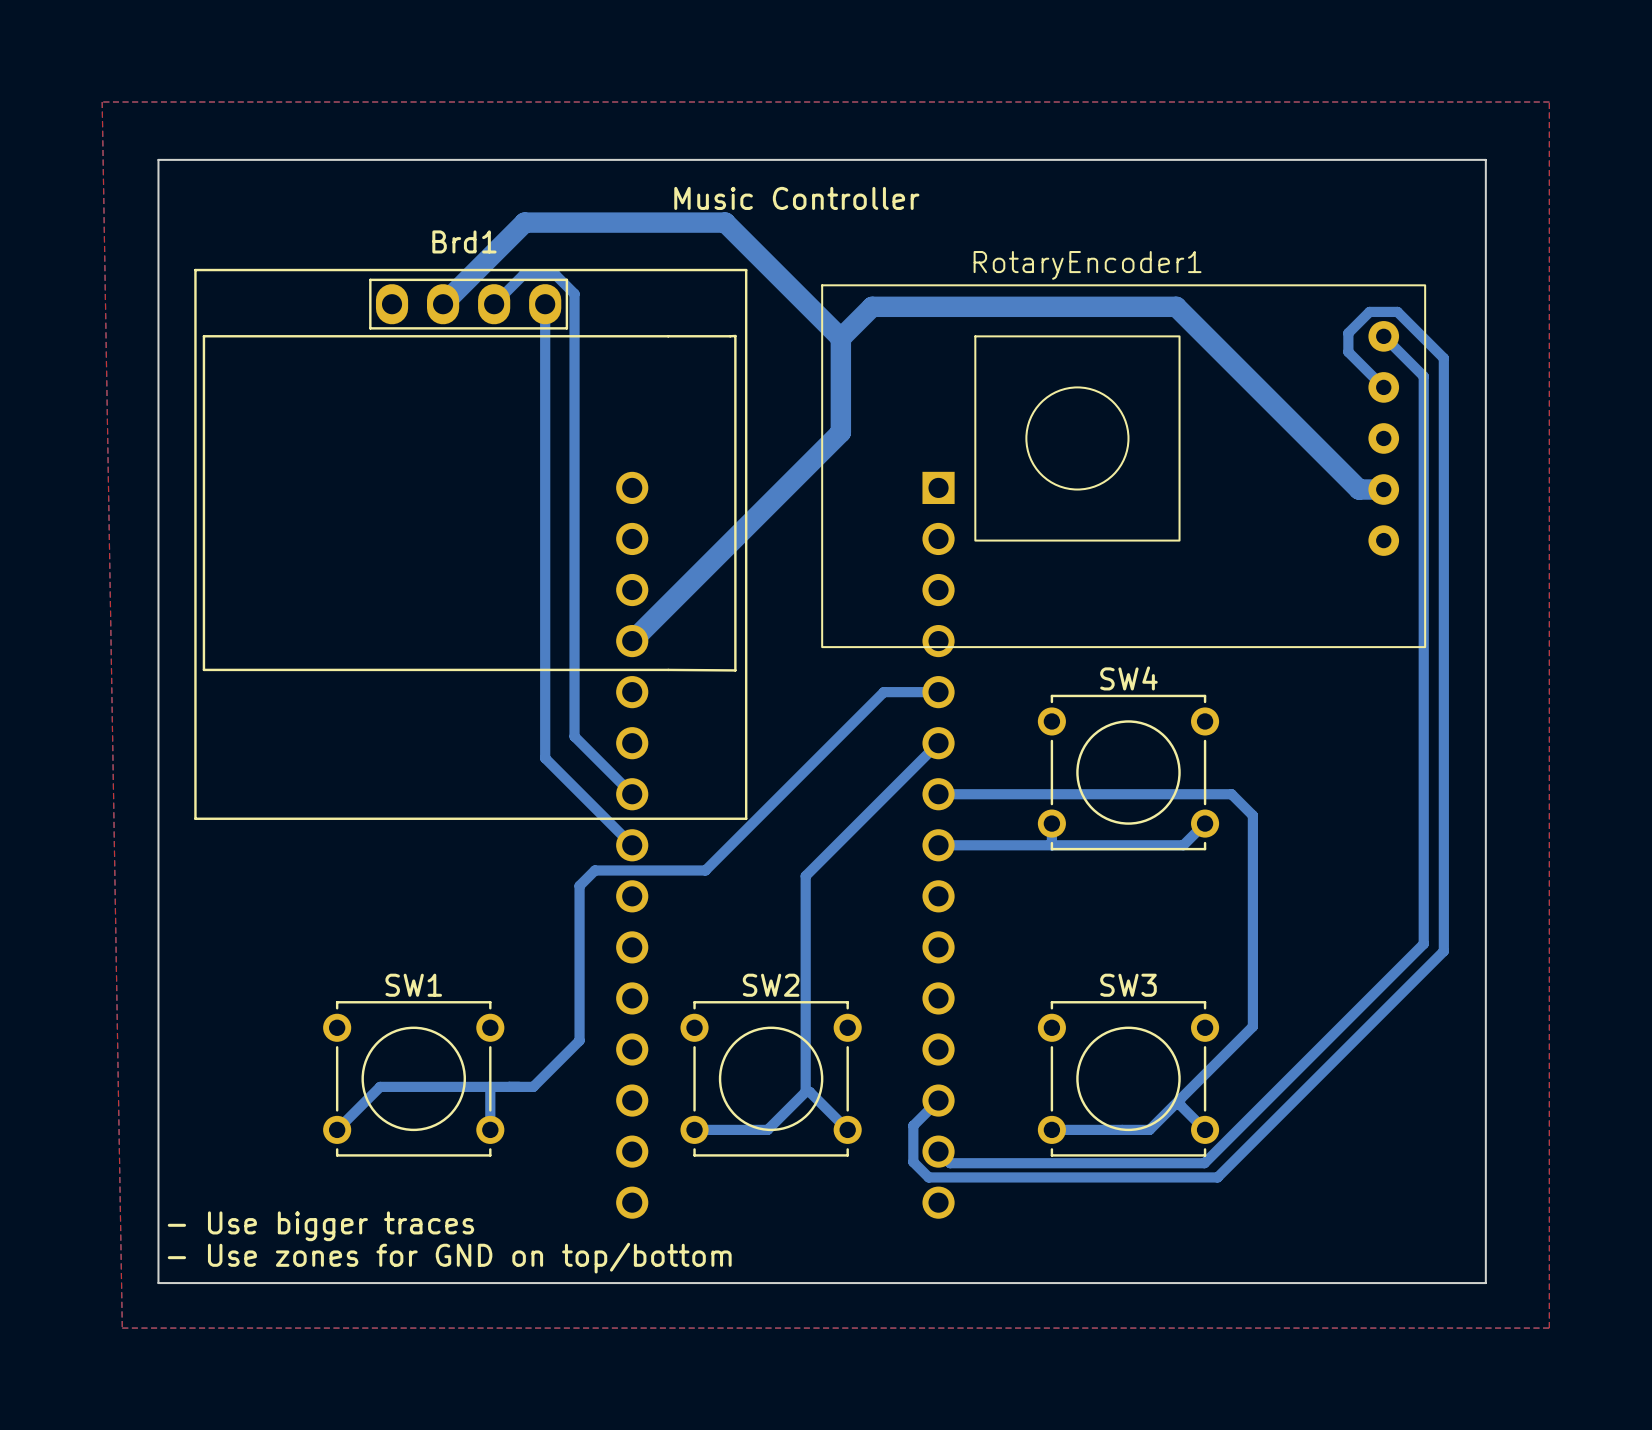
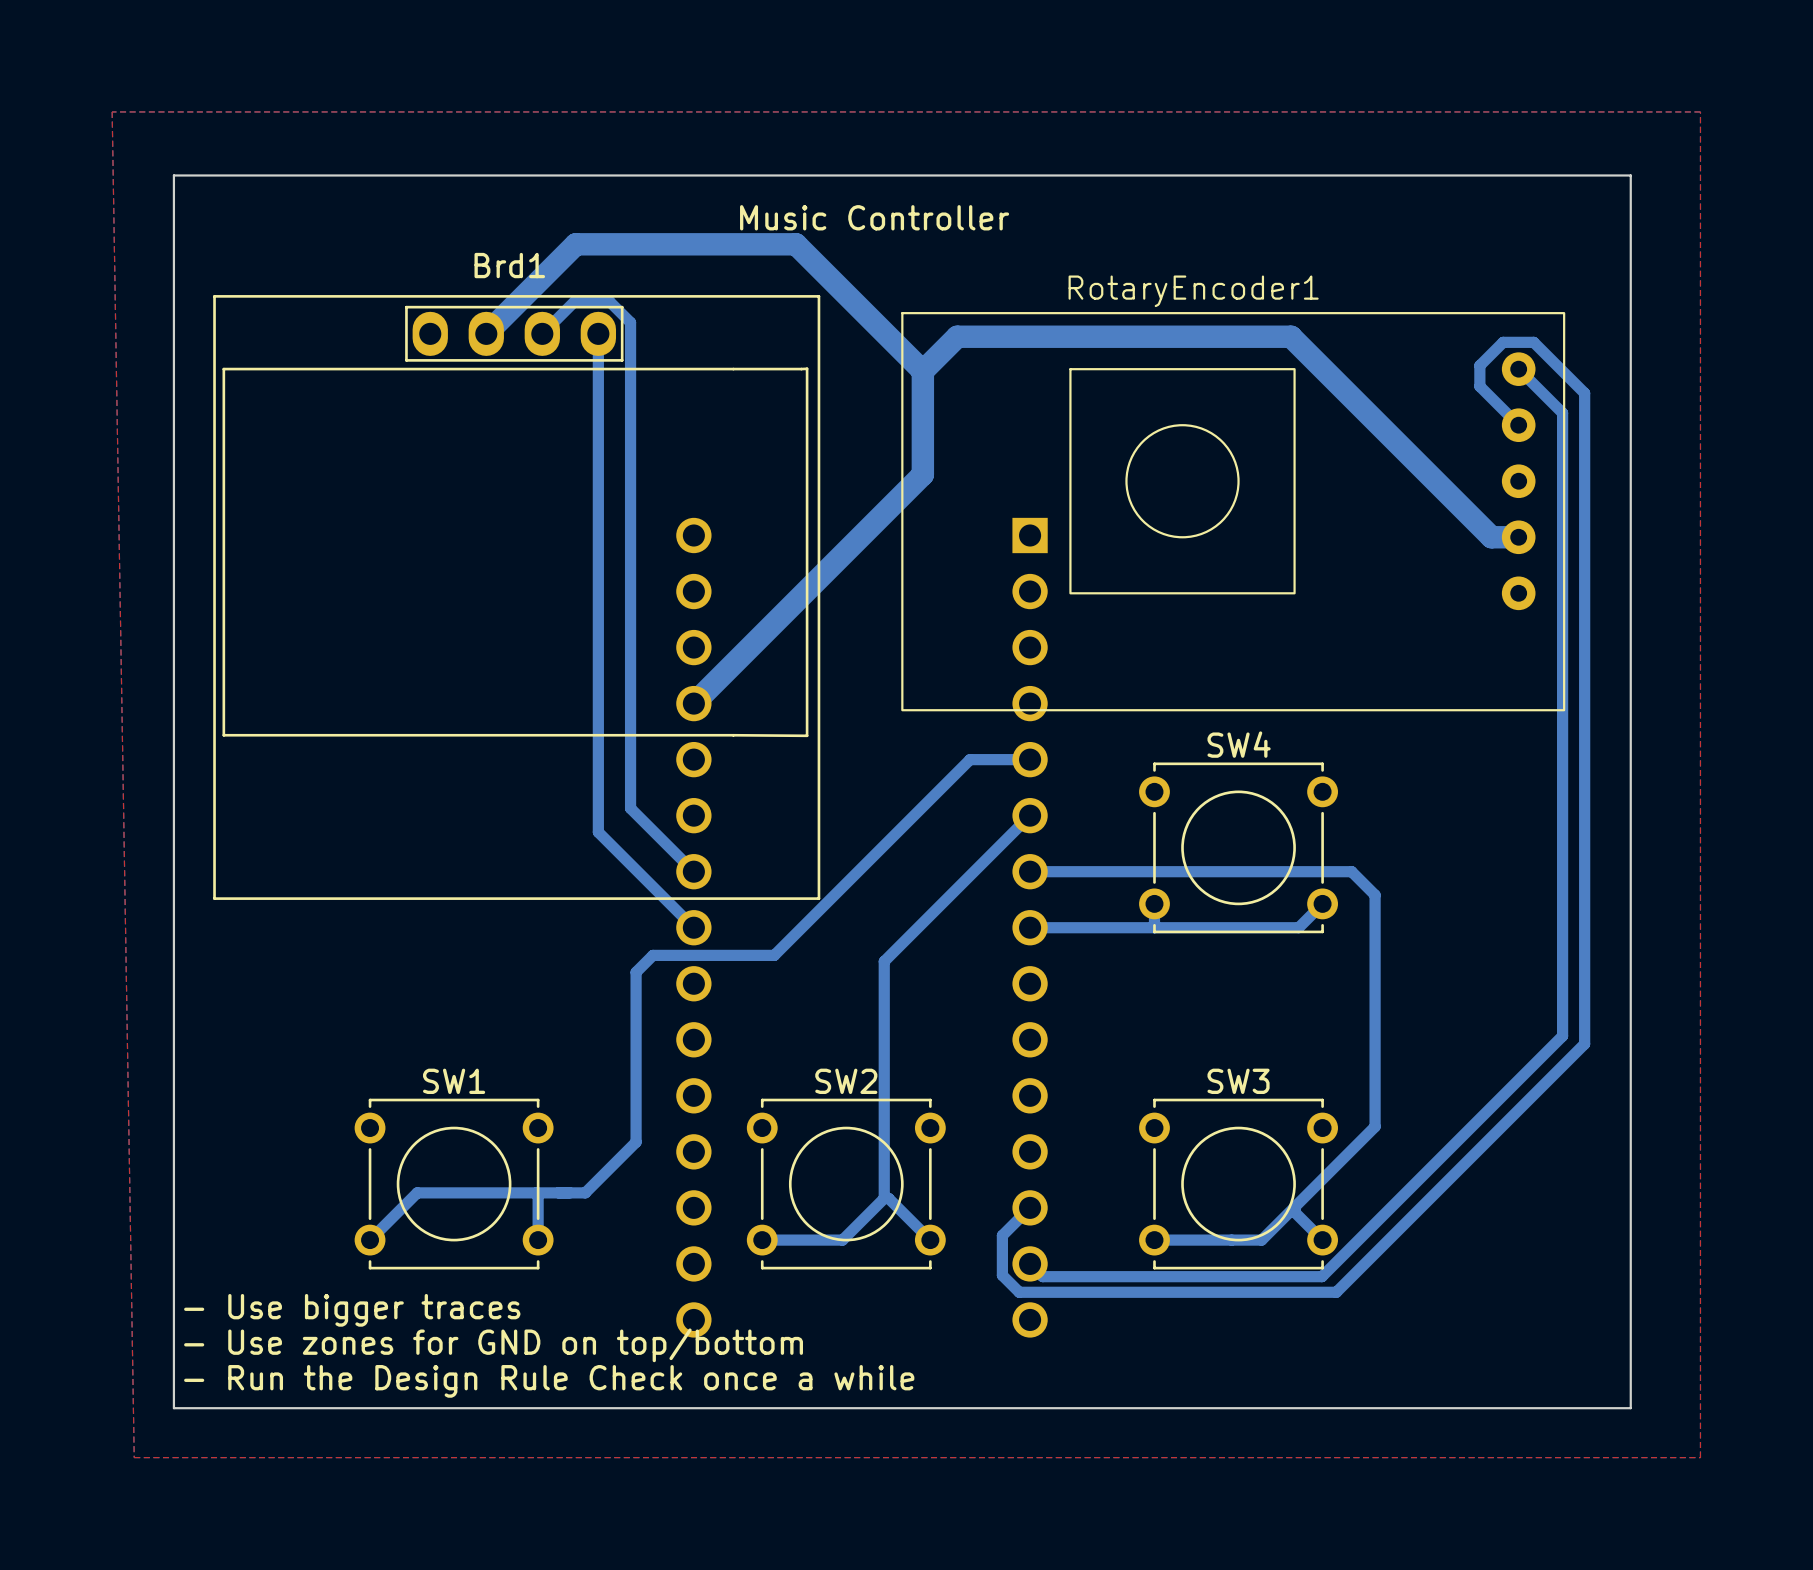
text: none -> - Use bigger traces (352, 1310)
text: - Use bigger traces (320, 1226) -> - Use zones for GND on top/bottom (493, 1345)
text: - Use zones for GND on top/bottom (449, 1258) -> - Run the Design Rule Check once a while (549, 1381)

